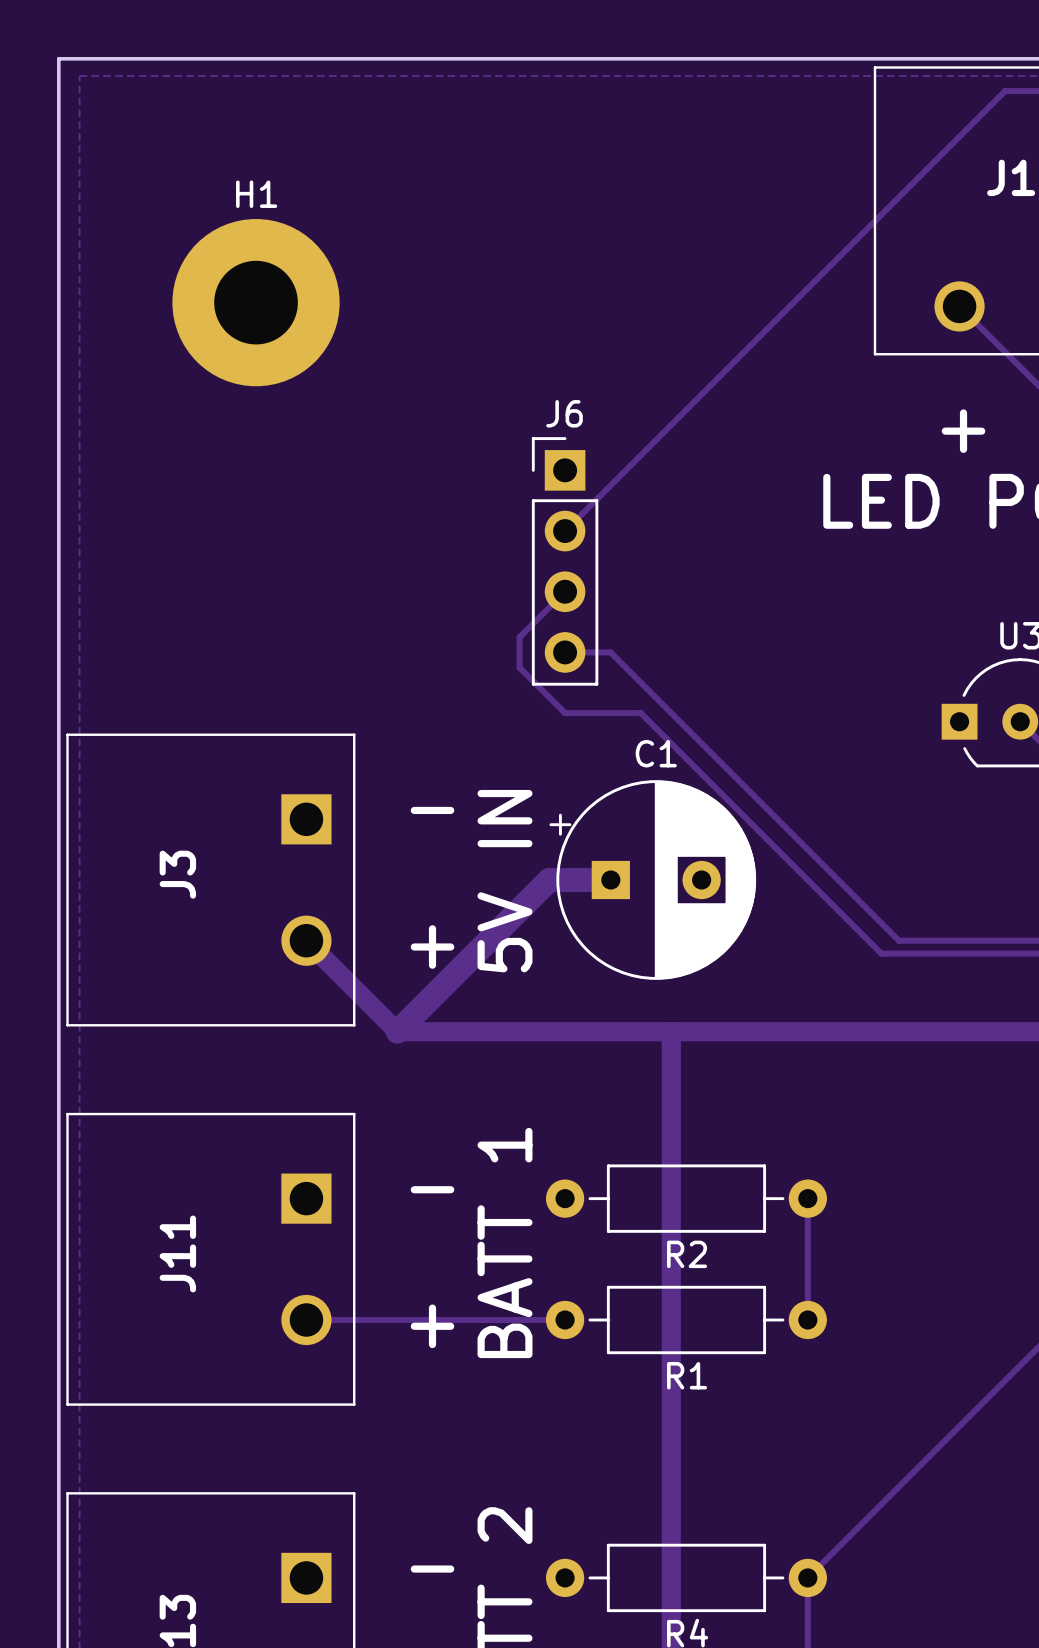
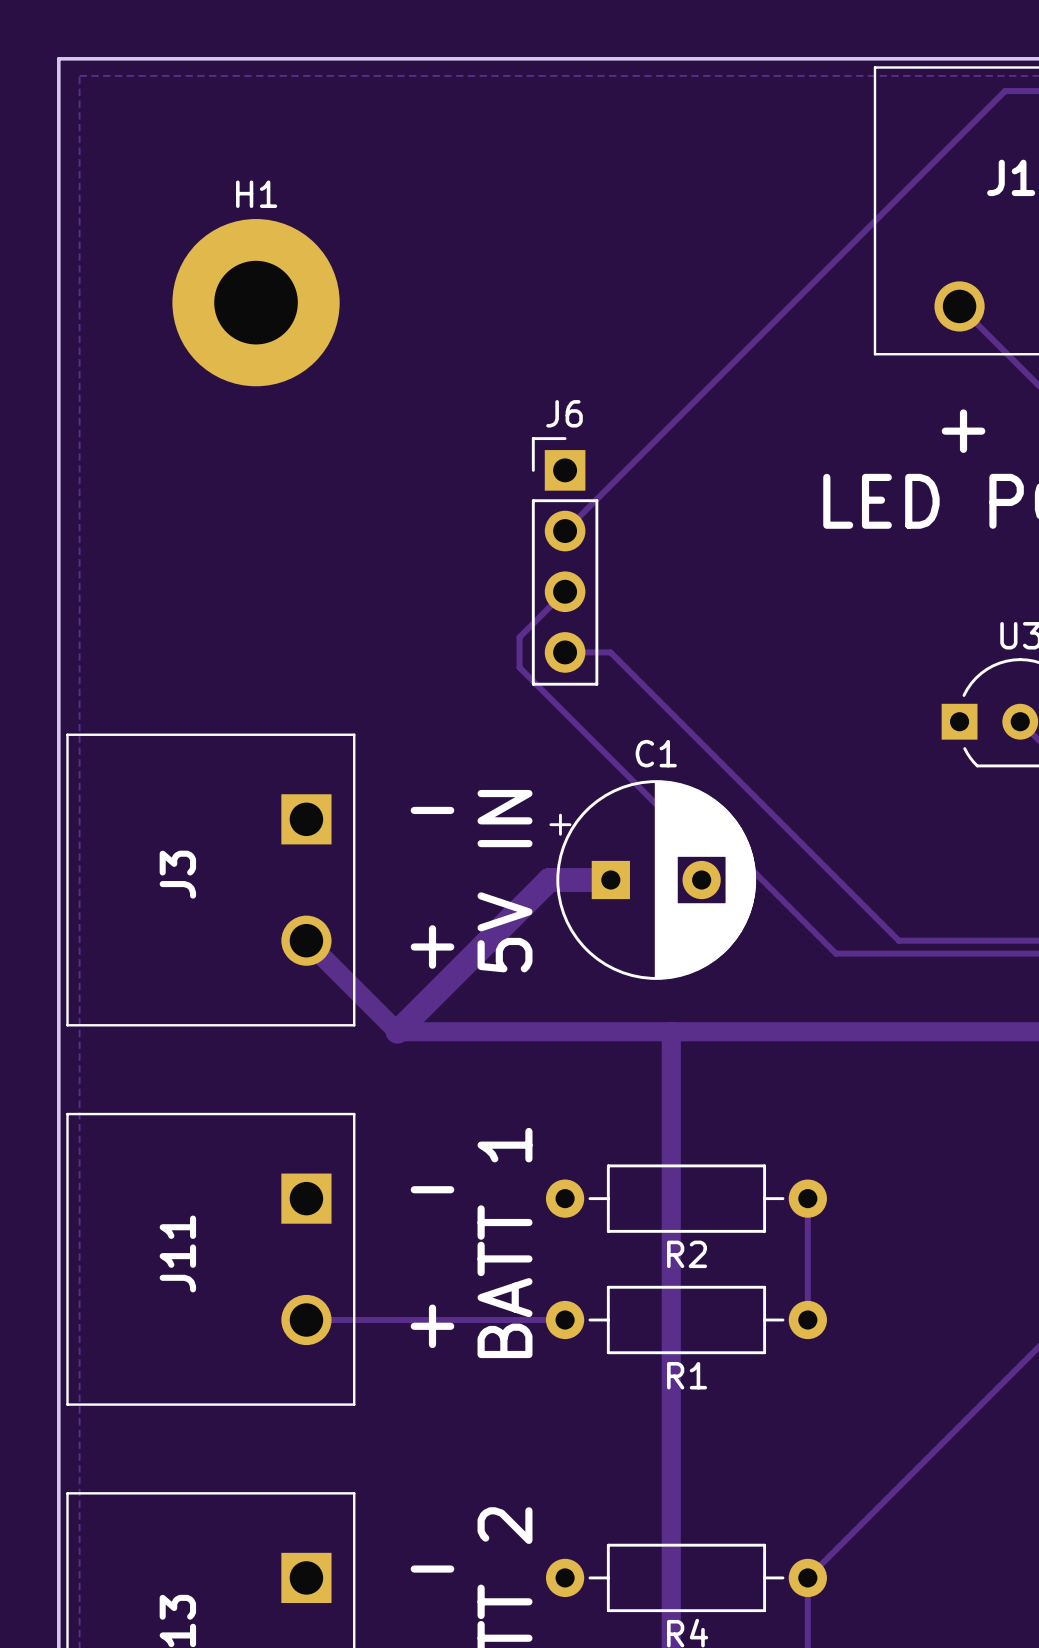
track: (565, 713) (640, 713) (881, 953) -> (565, 713) (686, 834) (716, 834) (835, 953) (881, 953)

